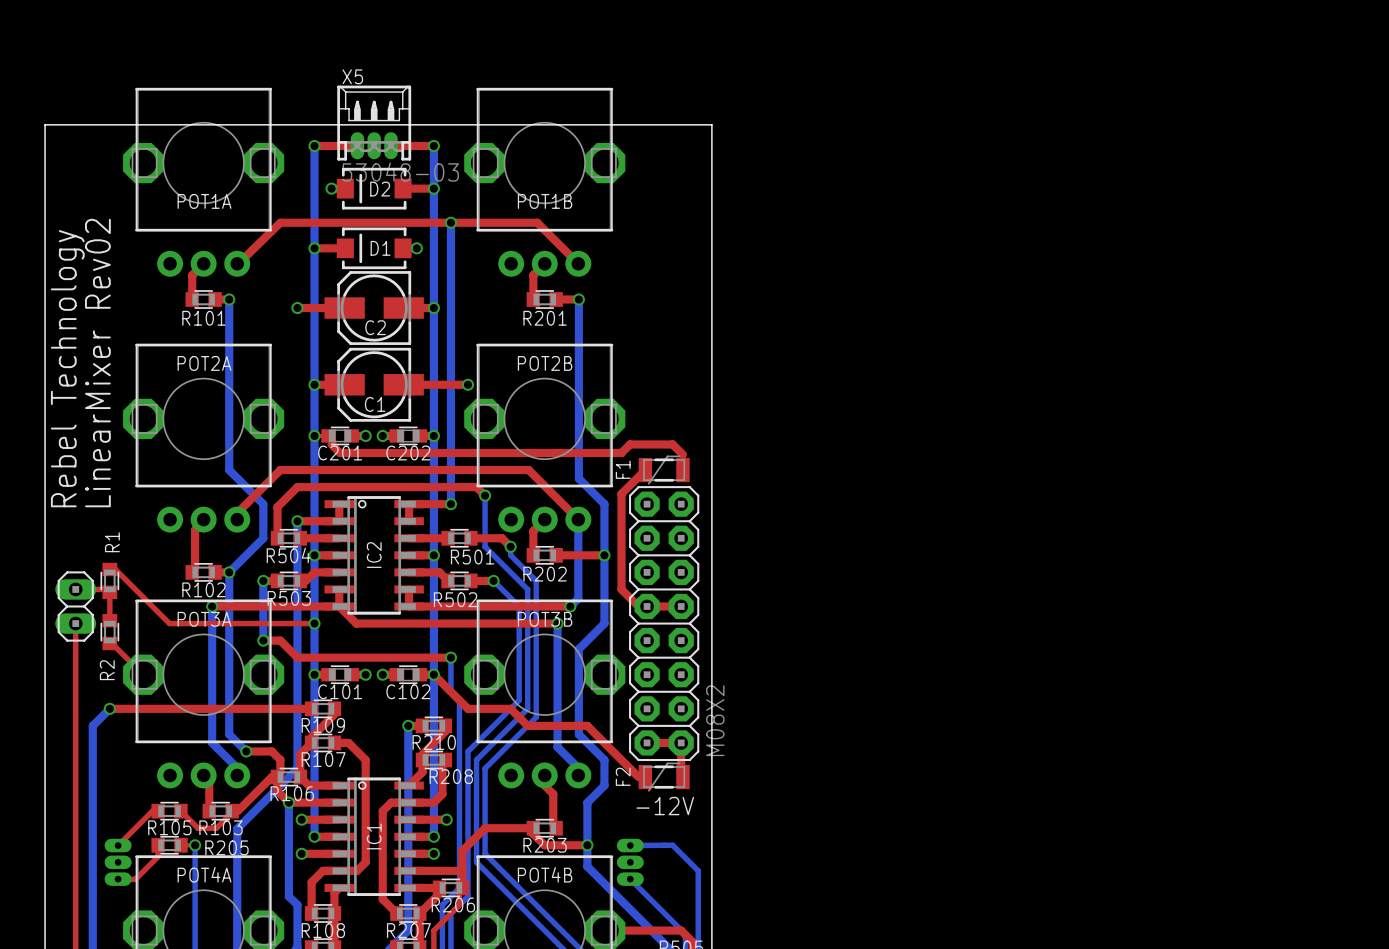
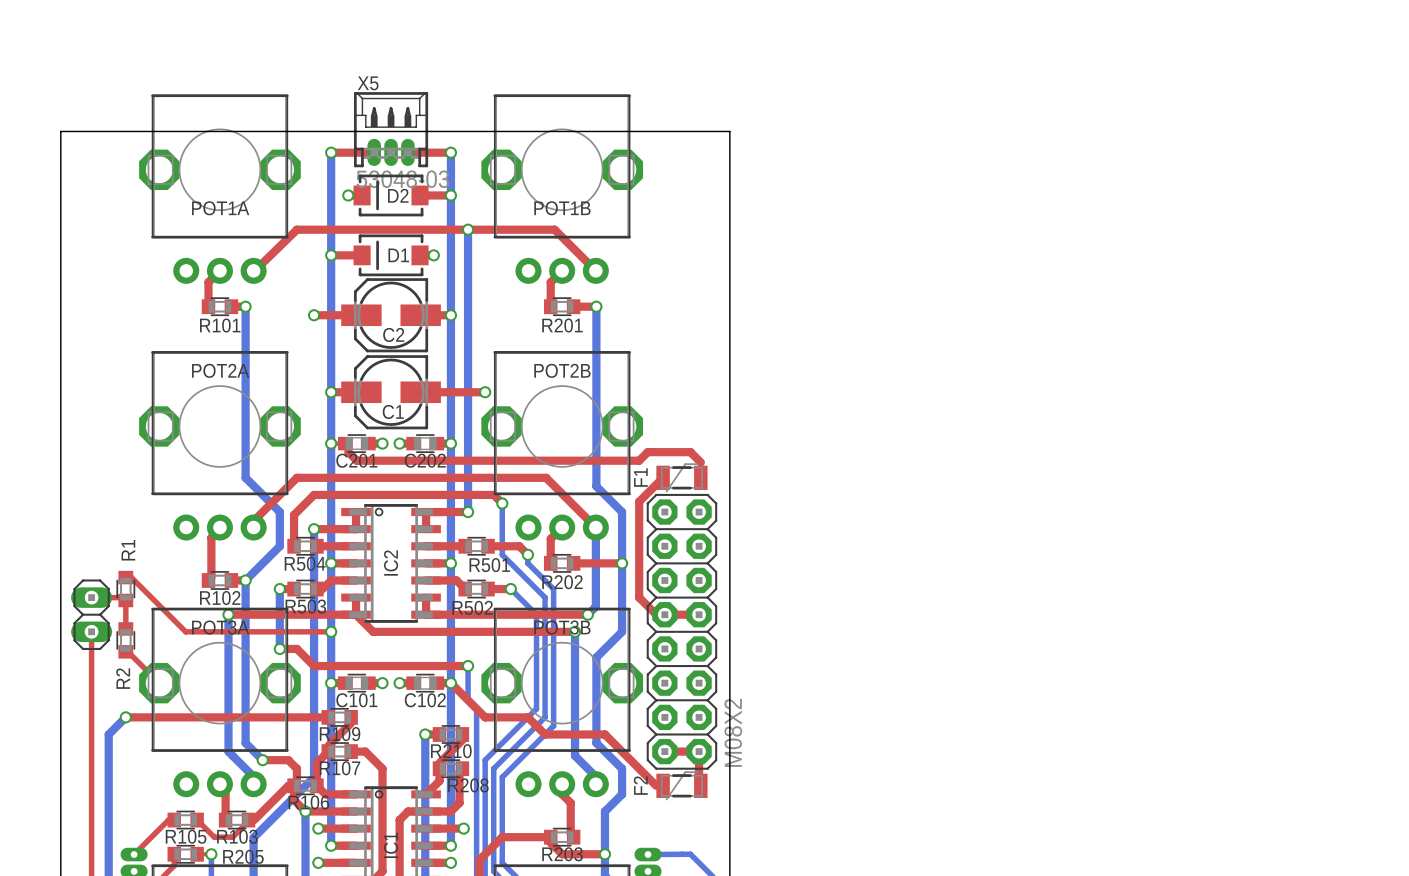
text: LinearMixer Rev02 (97, 363) -> none
text: Rebel Technology (67, 368) -> none
text: -12V (665, 806) -> none

